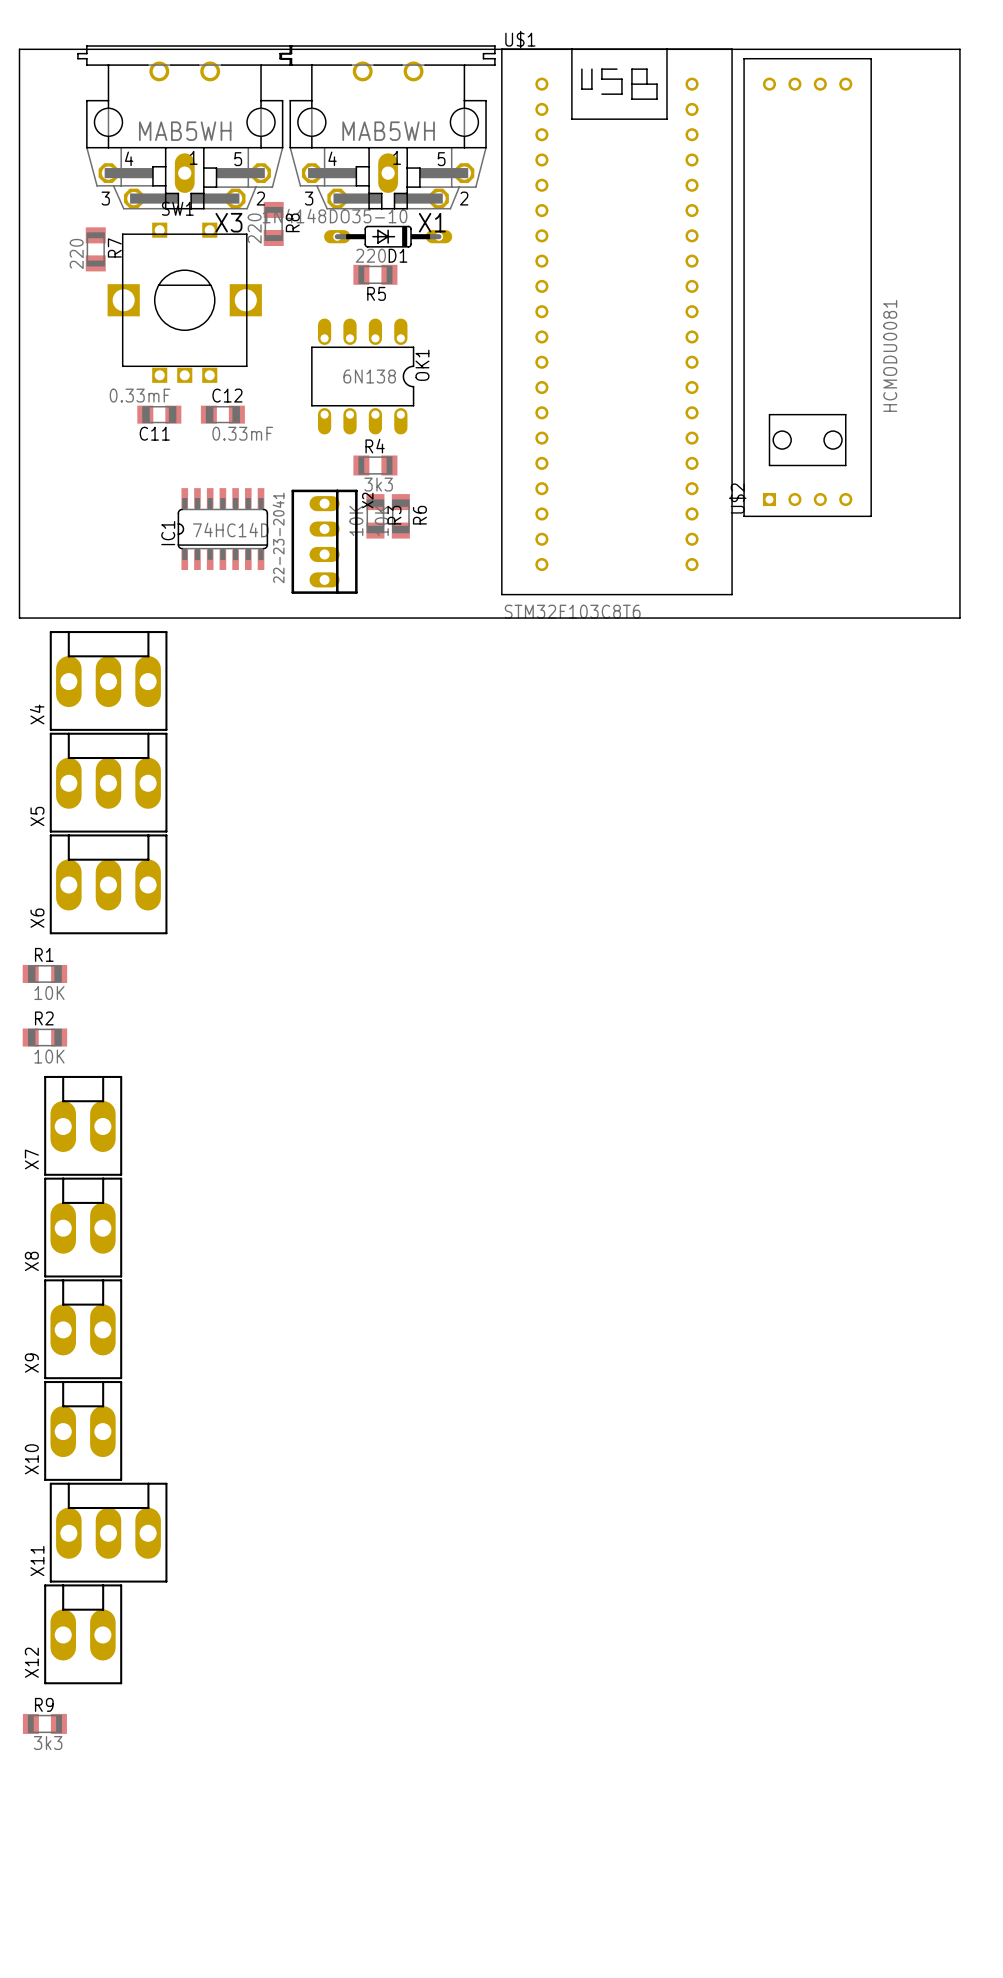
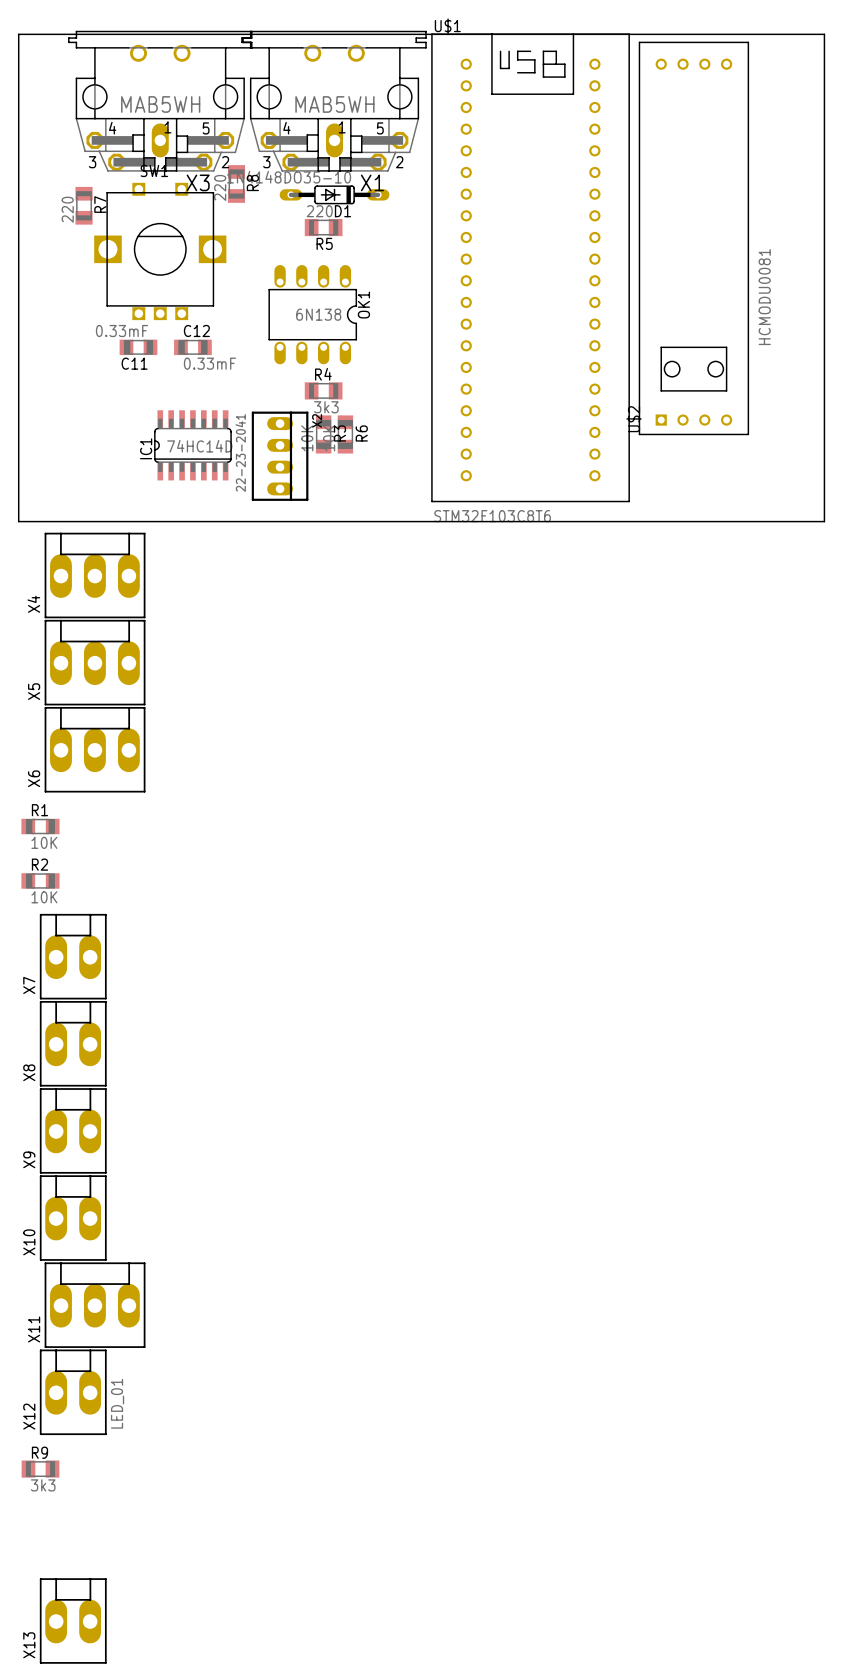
X12 value: none -> LED_01 (117, 1403)
X13: none -> (73, 1620)

